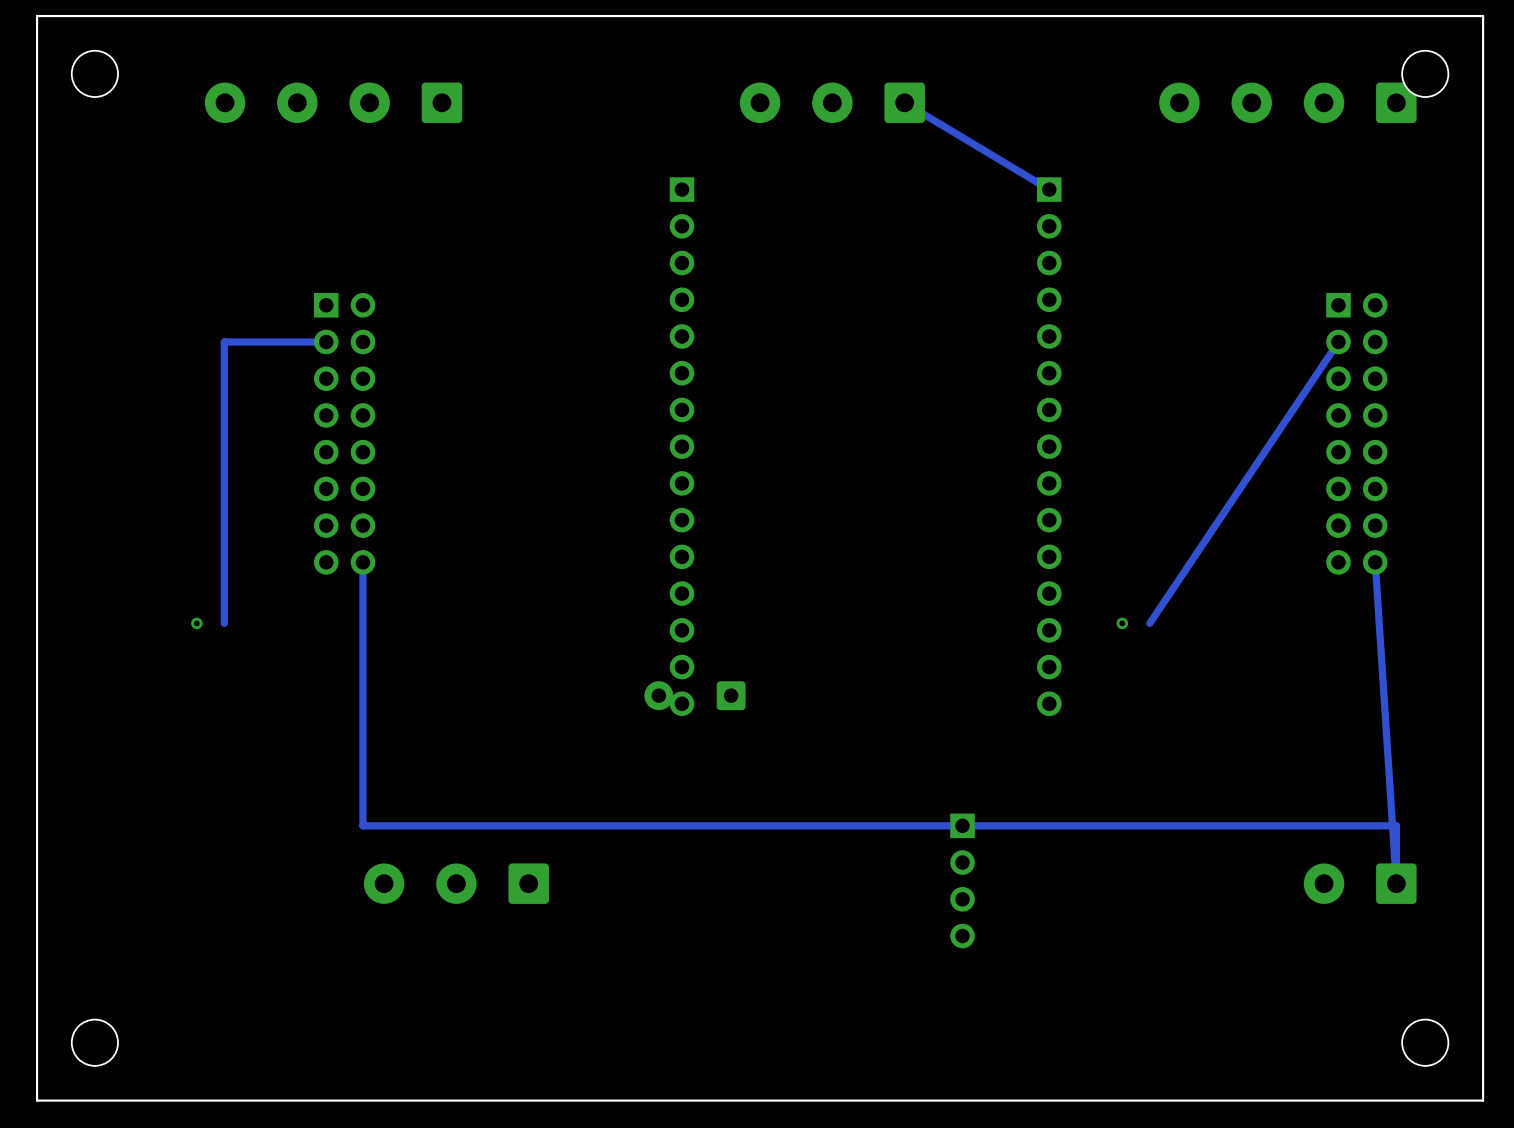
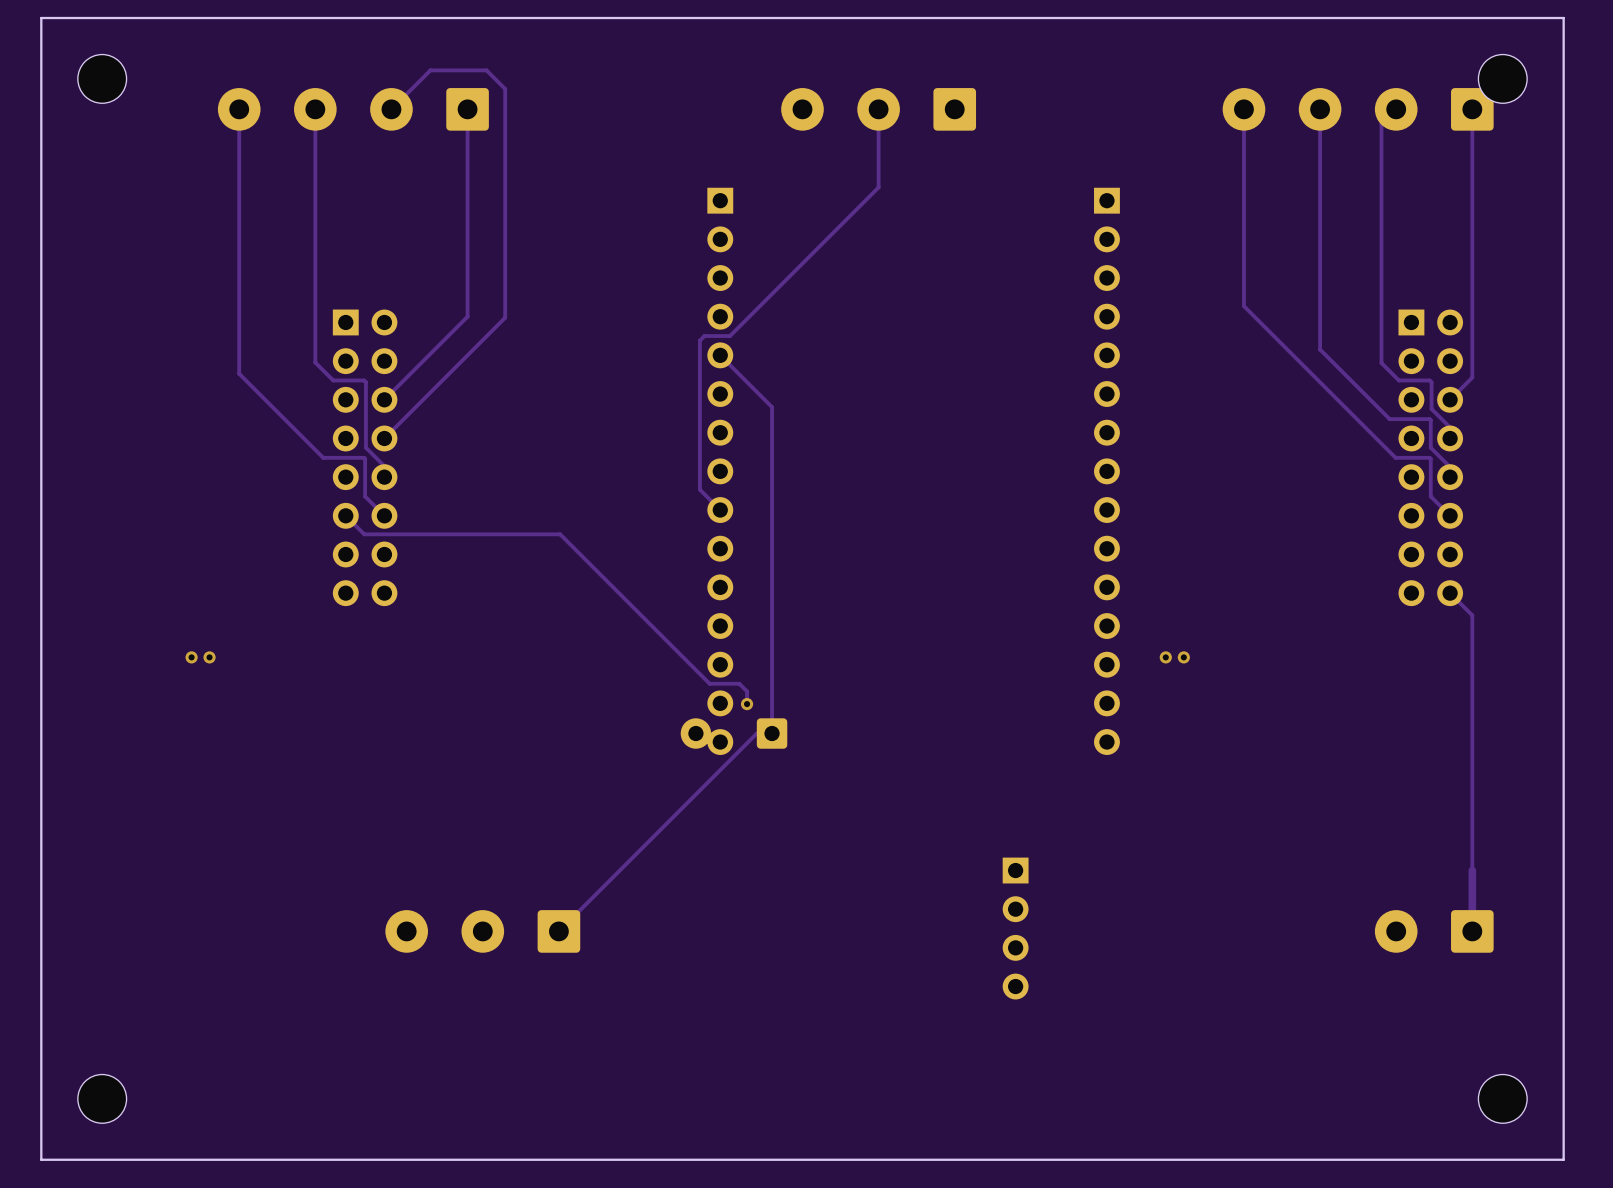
track: none -> (239, 109) (239, 373) (323, 457) (364, 457) (365, 496) (384, 515)
track: none -> (315, 109) (315, 362) (333, 380) (364, 380) (365, 382) (365, 447) (384, 466) (384, 477)
track: none -> (391, 109) (430, 70) (486, 70) (505, 89) (505, 317) (384, 438)
track: none -> (467, 109) (467, 316) (384, 399)
track: none -> (878, 109) (878, 187) (730, 336) (704, 336) (699, 340) (699, 489) (720, 510)
track: (904, 102) (1049, 189) -> none
track: none -> (1243, 109) (1243, 306) (1395, 457) (1430, 458) (1430, 496) (1450, 515)
track: none -> (1320, 109) (1320, 349) (1389, 419) (1429, 419) (1430, 447) (1450, 467) (1450, 477)
track: none -> (1396, 109) (1381, 124) (1381, 363) (1398, 380) (1429, 380) (1431, 382) (1431, 409) (1450, 427) (1450, 438)
track: none -> (1472, 109) (1472, 377) (1450, 399)
track: none -> (720, 355) (772, 407) (772, 733) (756, 733) (558, 931)
track: (326, 341) (224, 341) (224, 623) -> none
track: (1338, 341) (1149, 623) -> none
track: none -> (345, 515) (364, 534) (560, 534) (709, 683) (739, 683) (747, 691) (747, 704)
track: (362, 562) (362, 825) (1396, 825) -> none
track: (1375, 562) (1396, 883) -> (1450, 593) (1472, 615) (1472, 870)
via: none -> (191, 657)
via: none -> (1165, 657)
via: none -> (747, 704)

